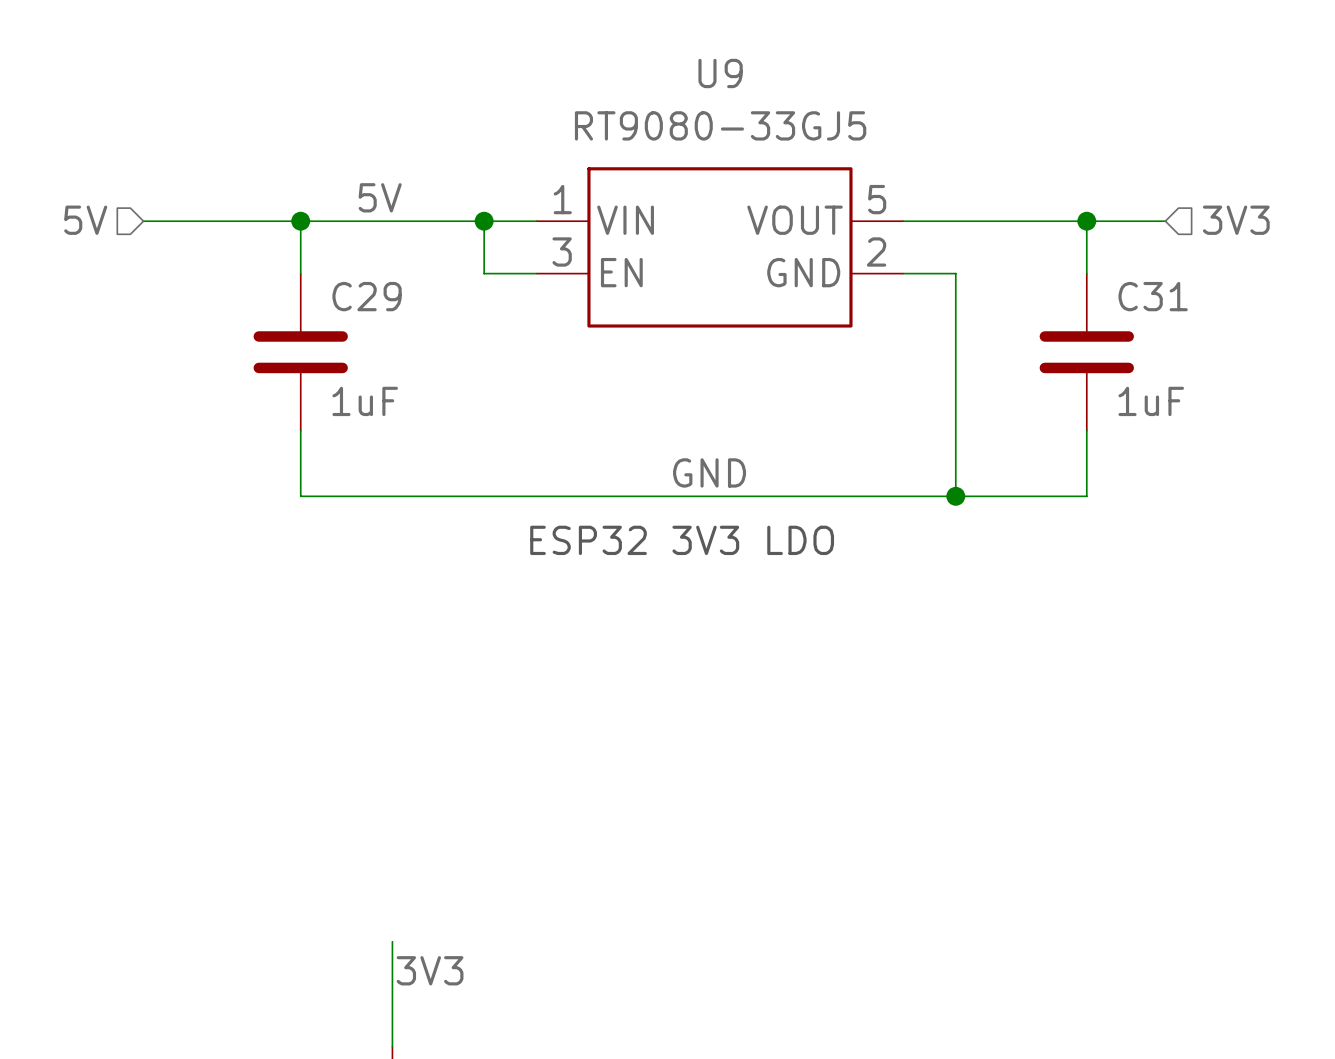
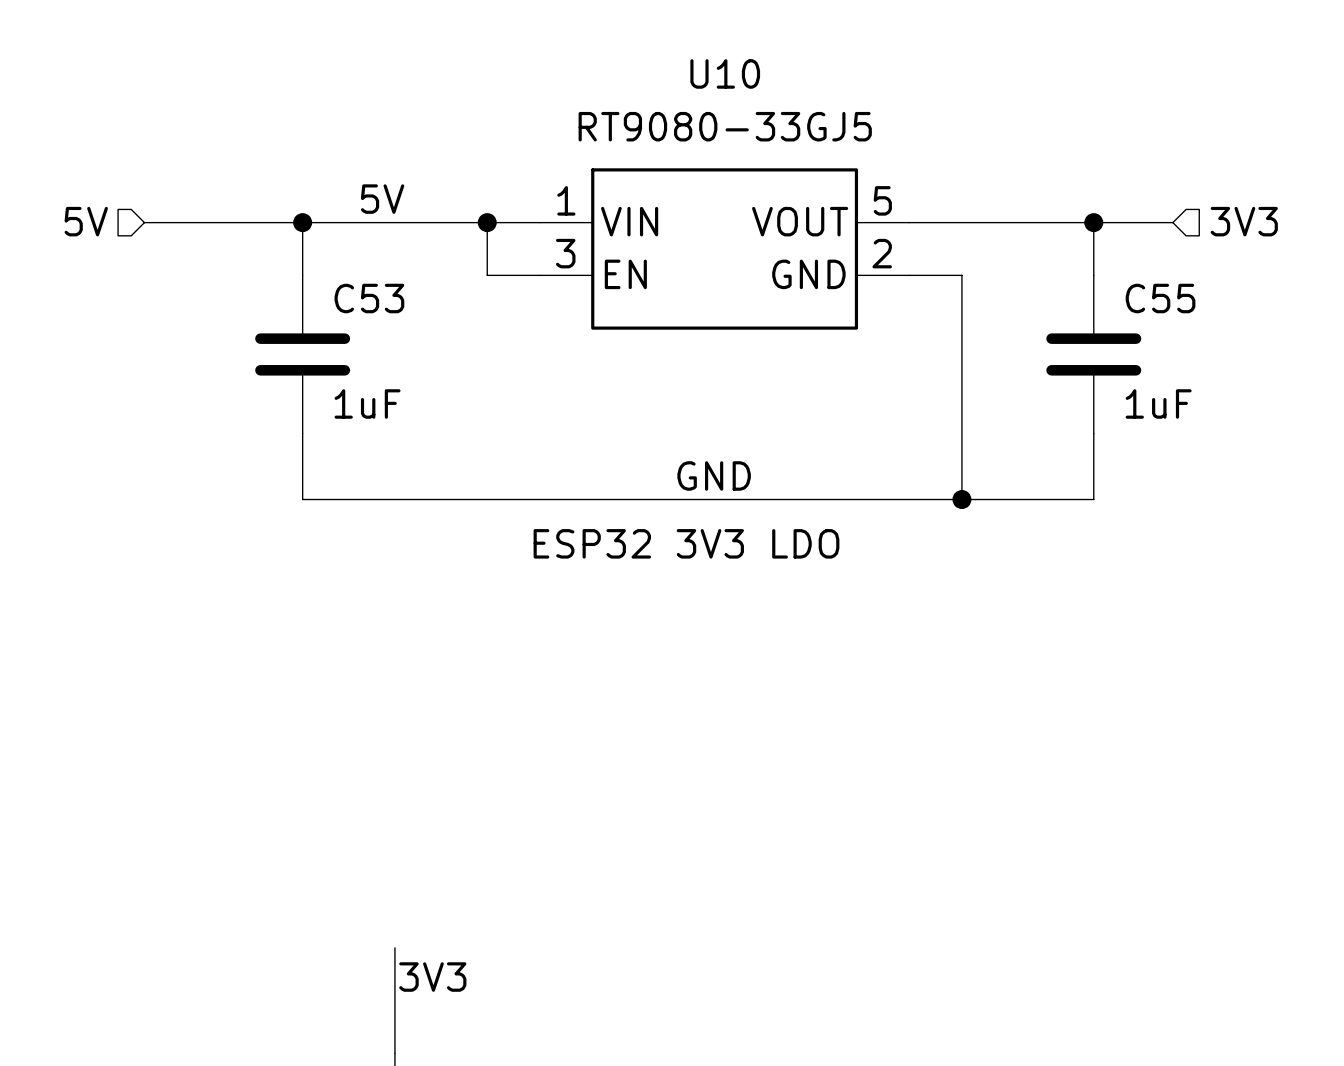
U9 name: U9 (720, 73) -> U10 (725, 73)
C29 name: C29 (367, 296) -> C53 (369, 298)
C31 name: C31 (1153, 296) -> C55 (1160, 298)

